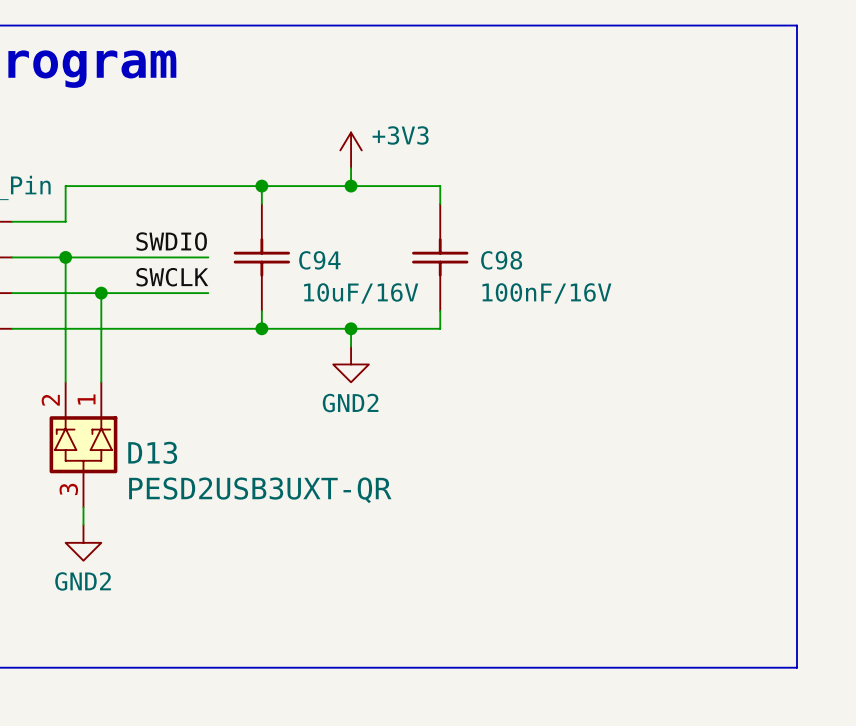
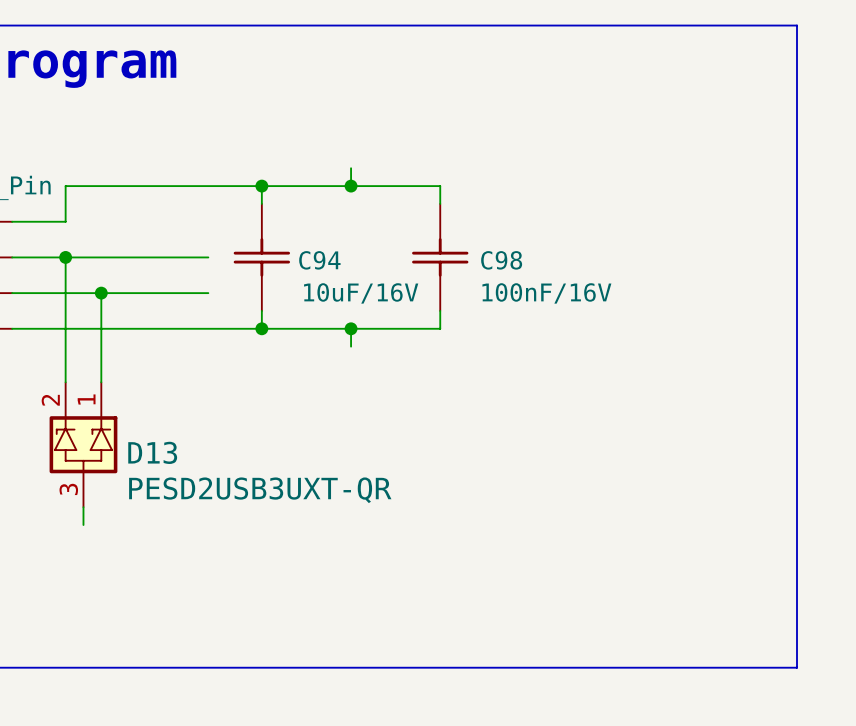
power symbol: +3V3 (351, 150) -> none
label: SWDIO (171, 241) -> none
label: SWCLK (172, 277) -> none
power symbol: GND2 (351, 364) -> none
power symbol: GND2 (83, 542) -> none

